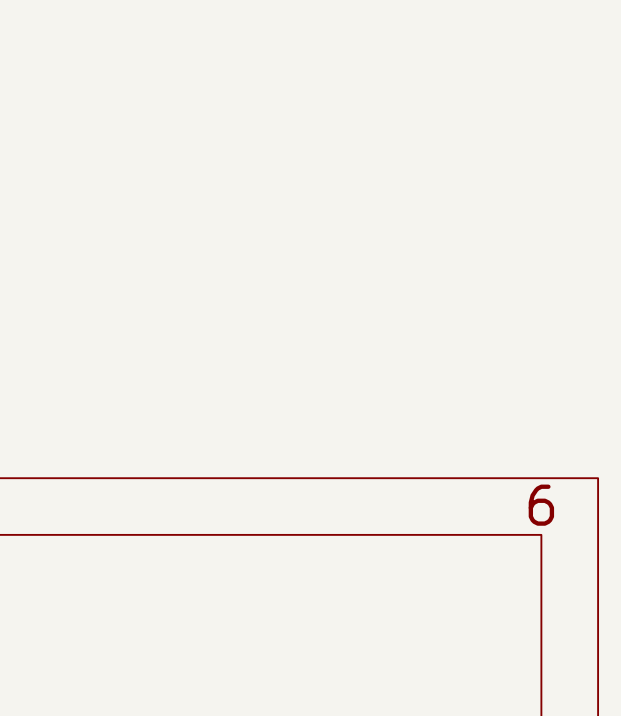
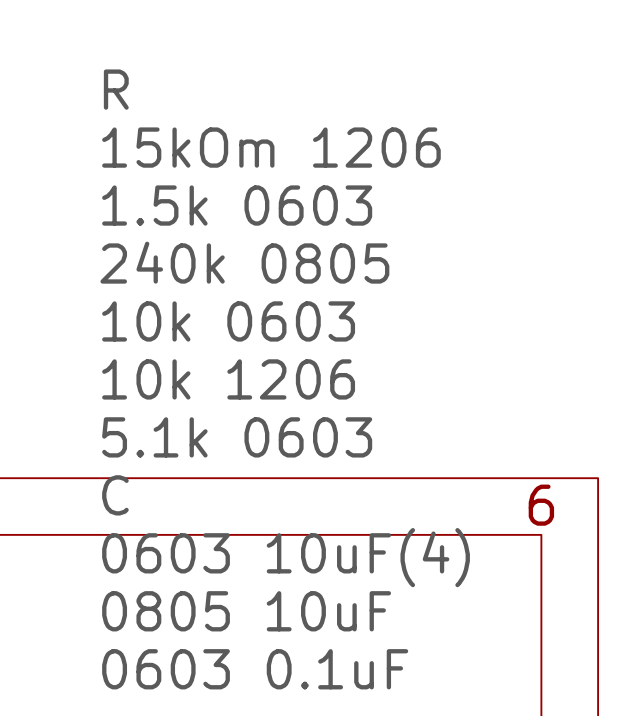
text: none -> R (116, 89)
text: none -> 15kOm 1206 (271, 147)
text: none -> 1.5k 0603 (237, 205)
text: none -> 240k 0805 (244, 262)
text: none -> 10k 0603 (228, 321)
text: none -> 10k 1206 (228, 379)
text: none -> 5.1k 0603 (237, 437)
text: none -> C (115, 495)
text: none -> 0603 10uF(4) (286, 557)
text: none -> 0805 10uF (246, 611)
text: none -> 0603 0.1uF (255, 669)

